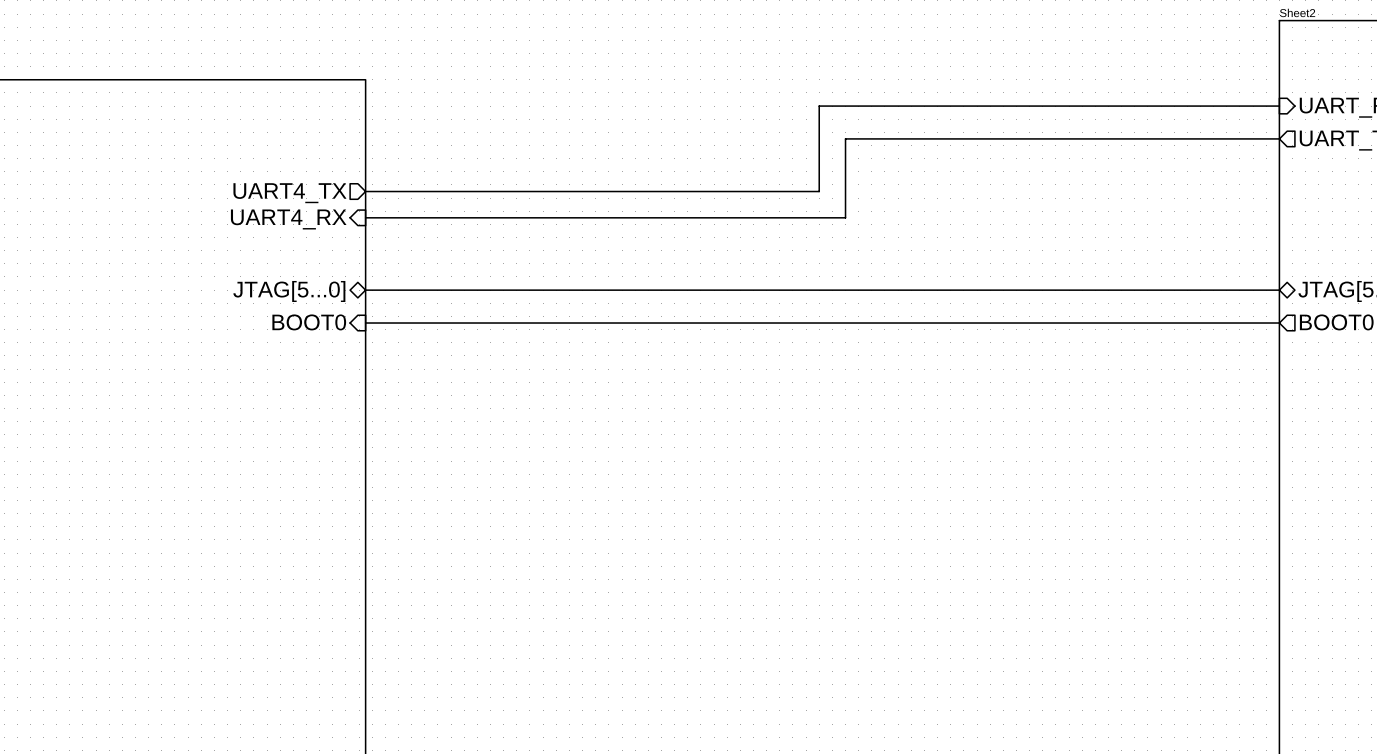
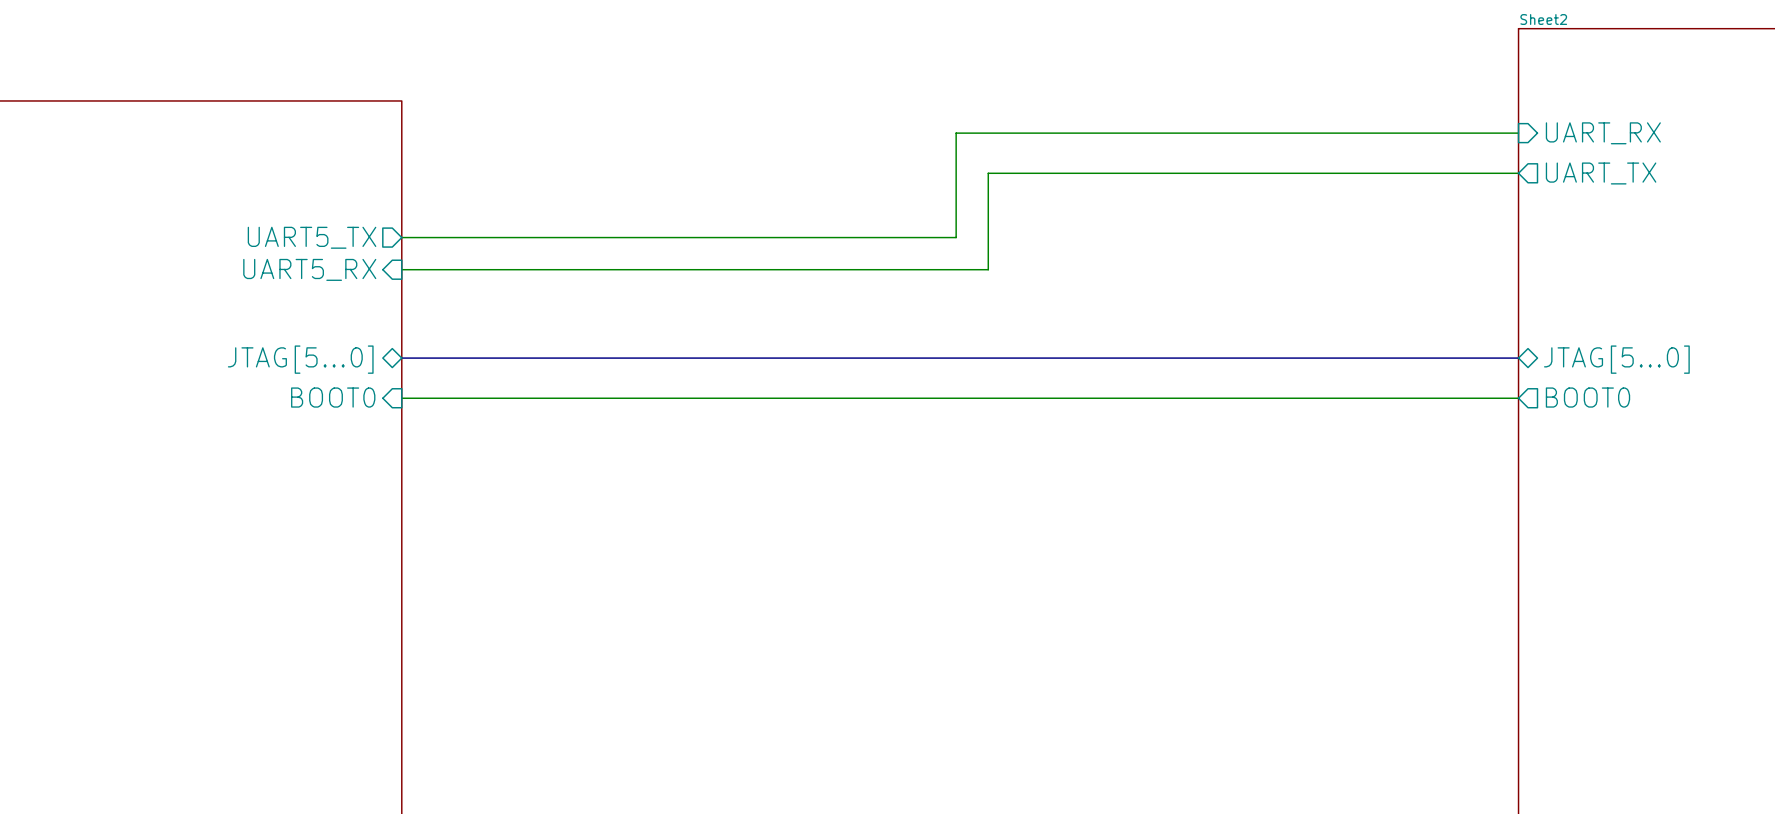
sheet pin: UART4_TX (289, 193) -> UART5_TX (312, 237)
sheet pin: UART4_RX (288, 219) -> UART5_RX (309, 269)

